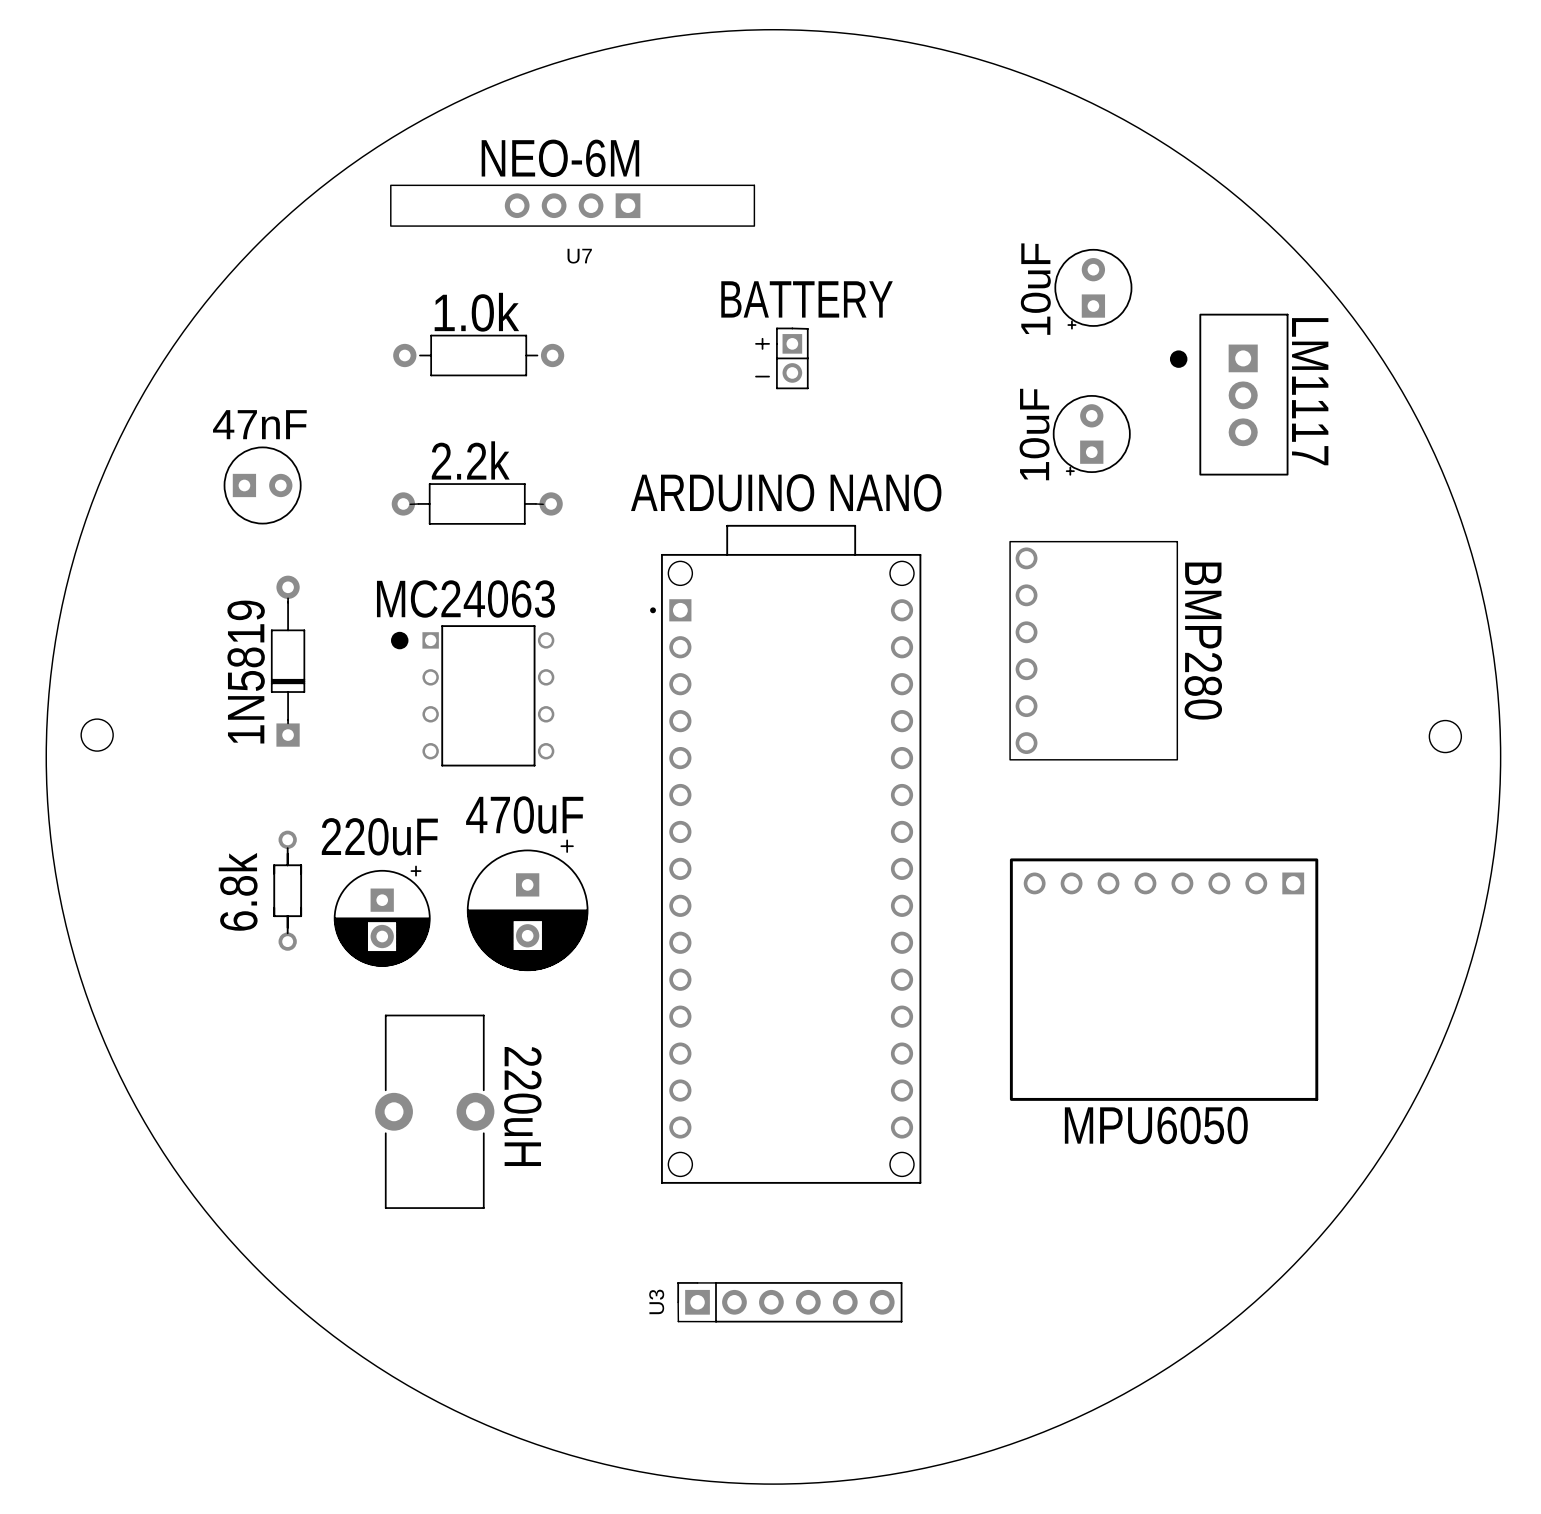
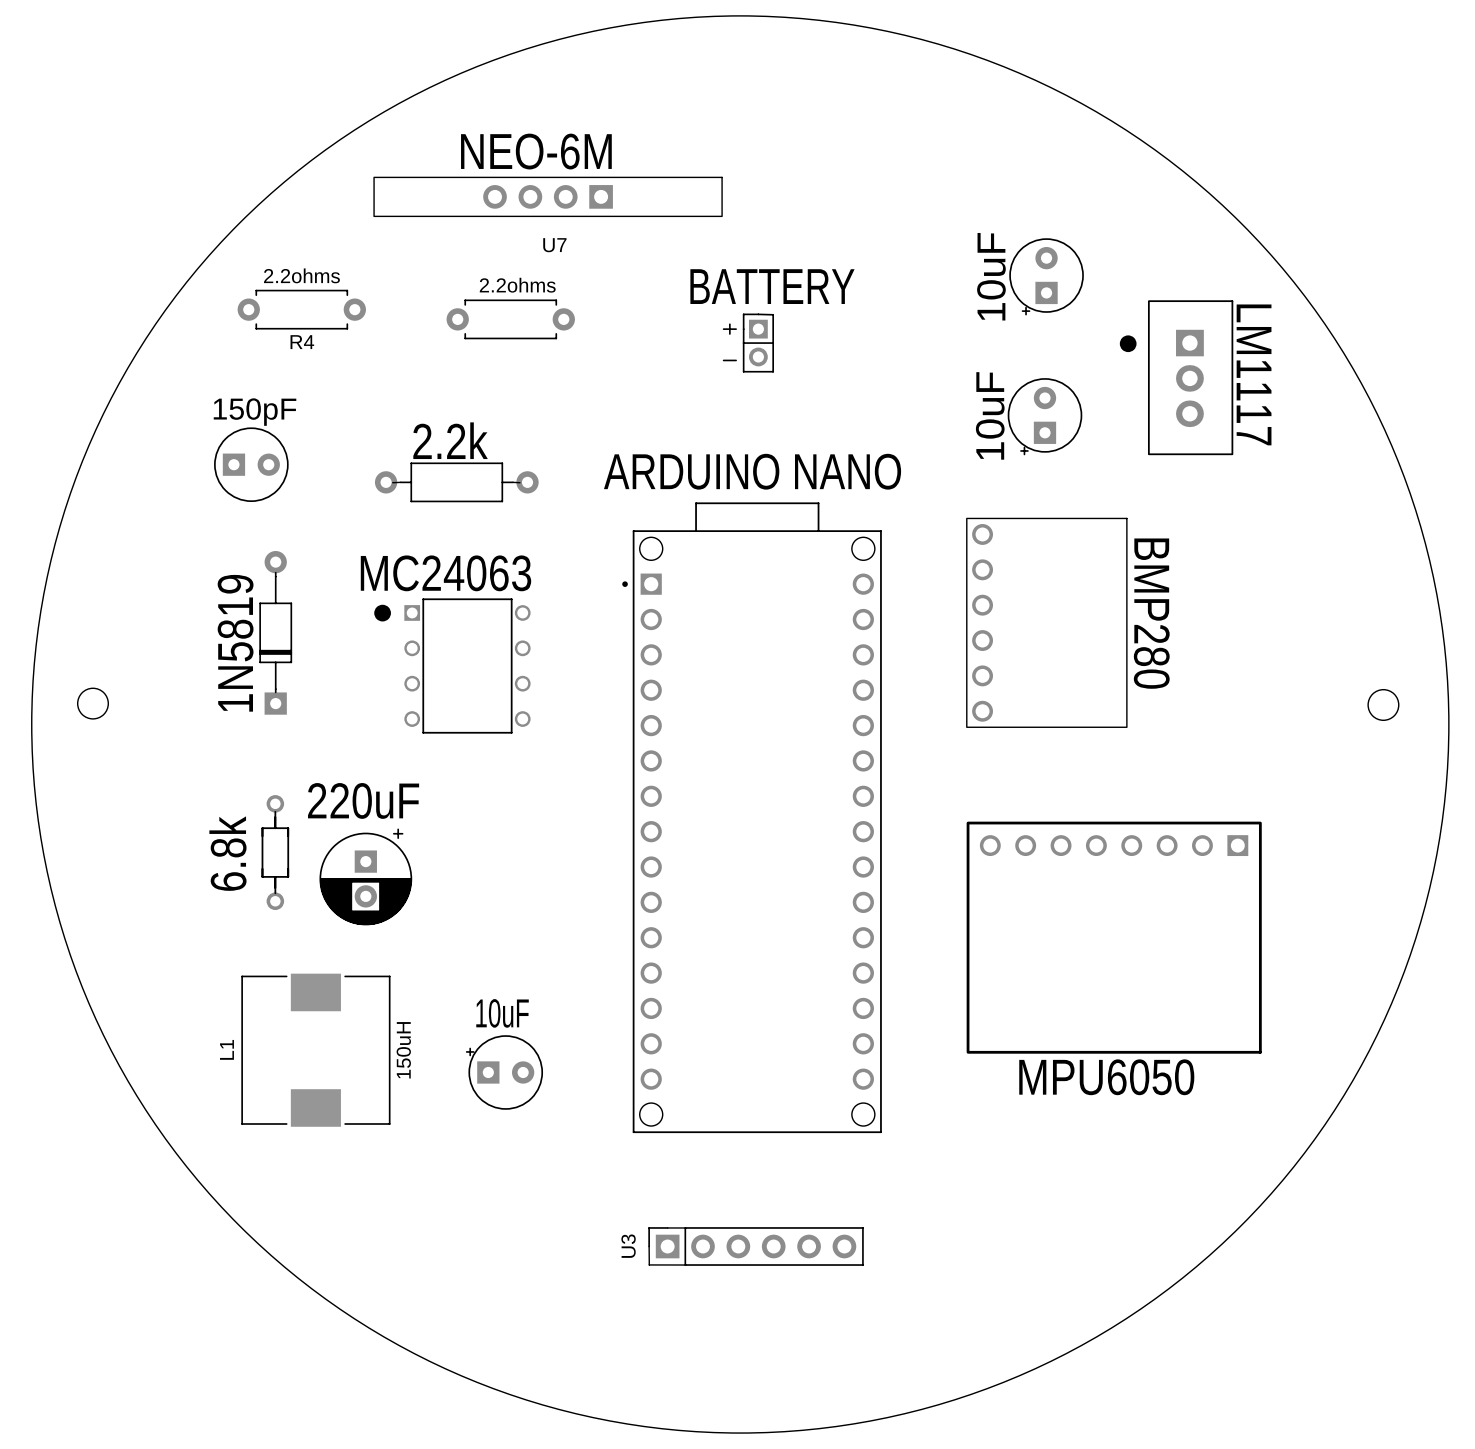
round board edge size: [45, 28, 1502, 1485] -> [31, 15, 1450, 1434]
R4: none -> 2.2ohms (301, 309)
part: none -> 2.2ohms (510, 319)
part: (478, 355) -> none
part text: 47nF (259, 424) -> none
part value: none -> 150pF (255, 412)
part: (527, 905) -> none
L1: none -> 150uH (315, 1050)
part: (434, 1111) -> none
part: none -> (504, 1072)

